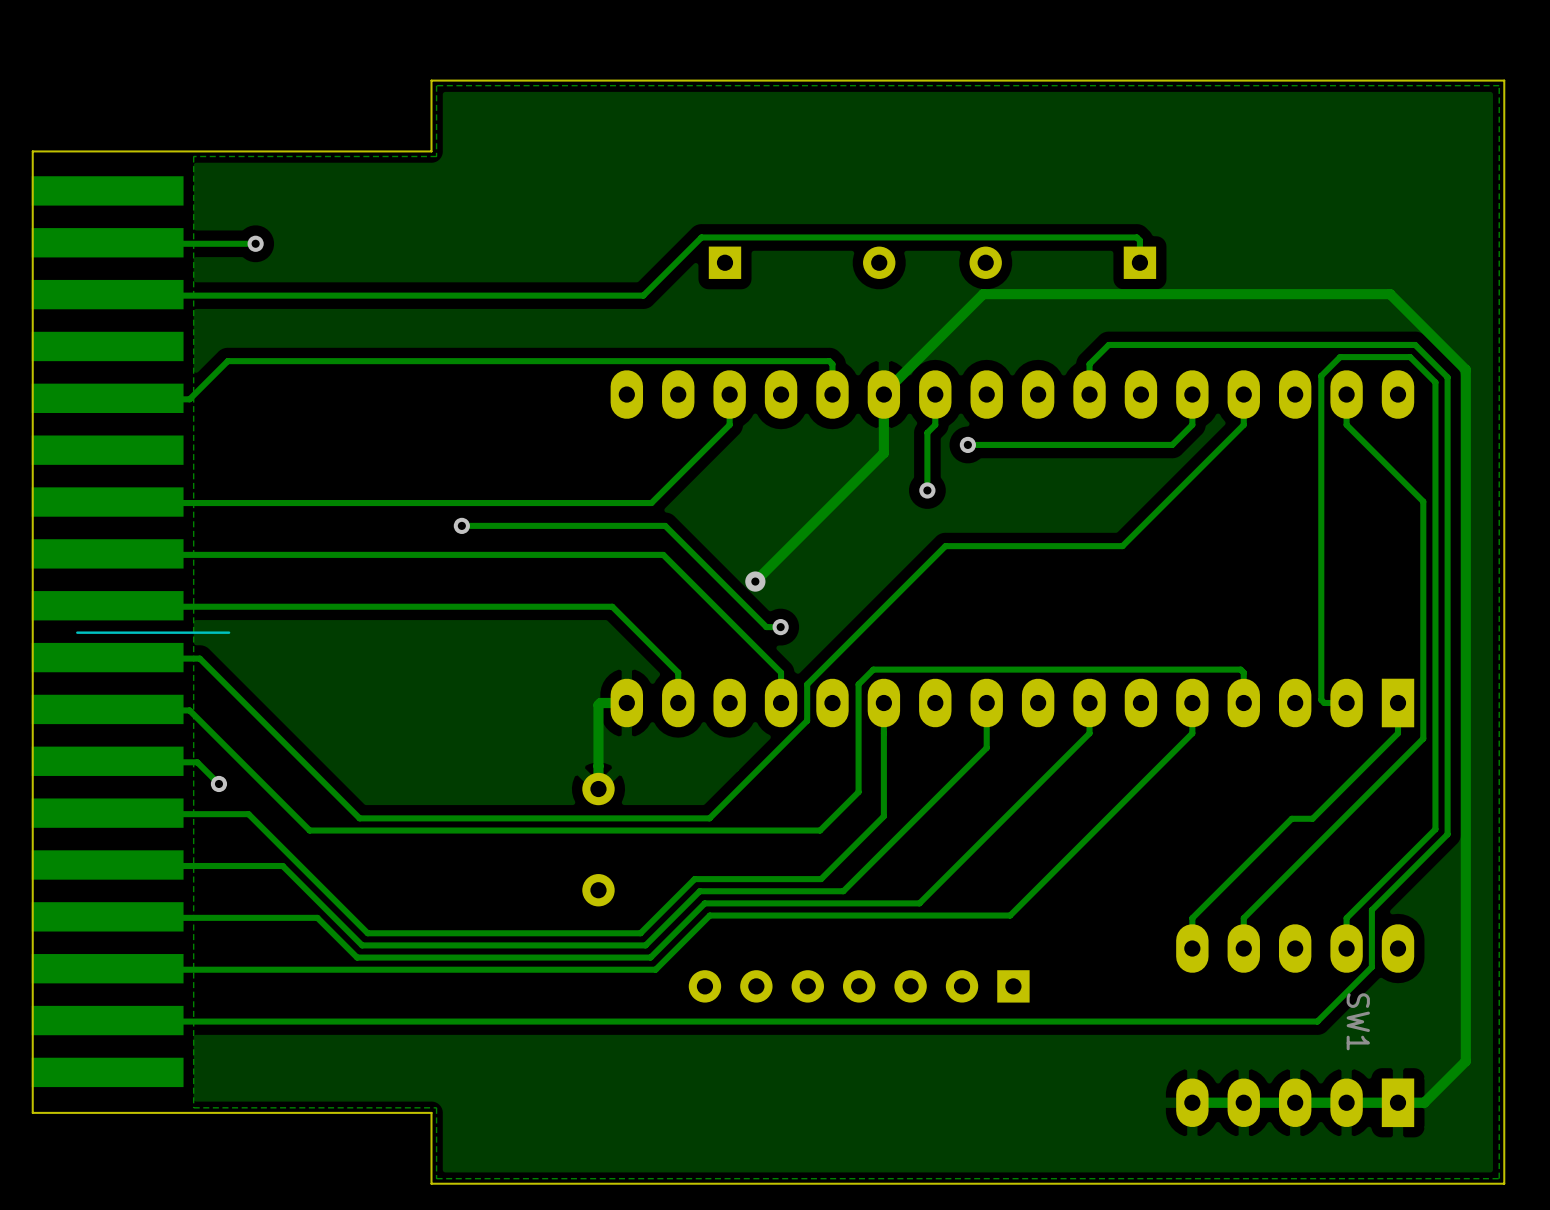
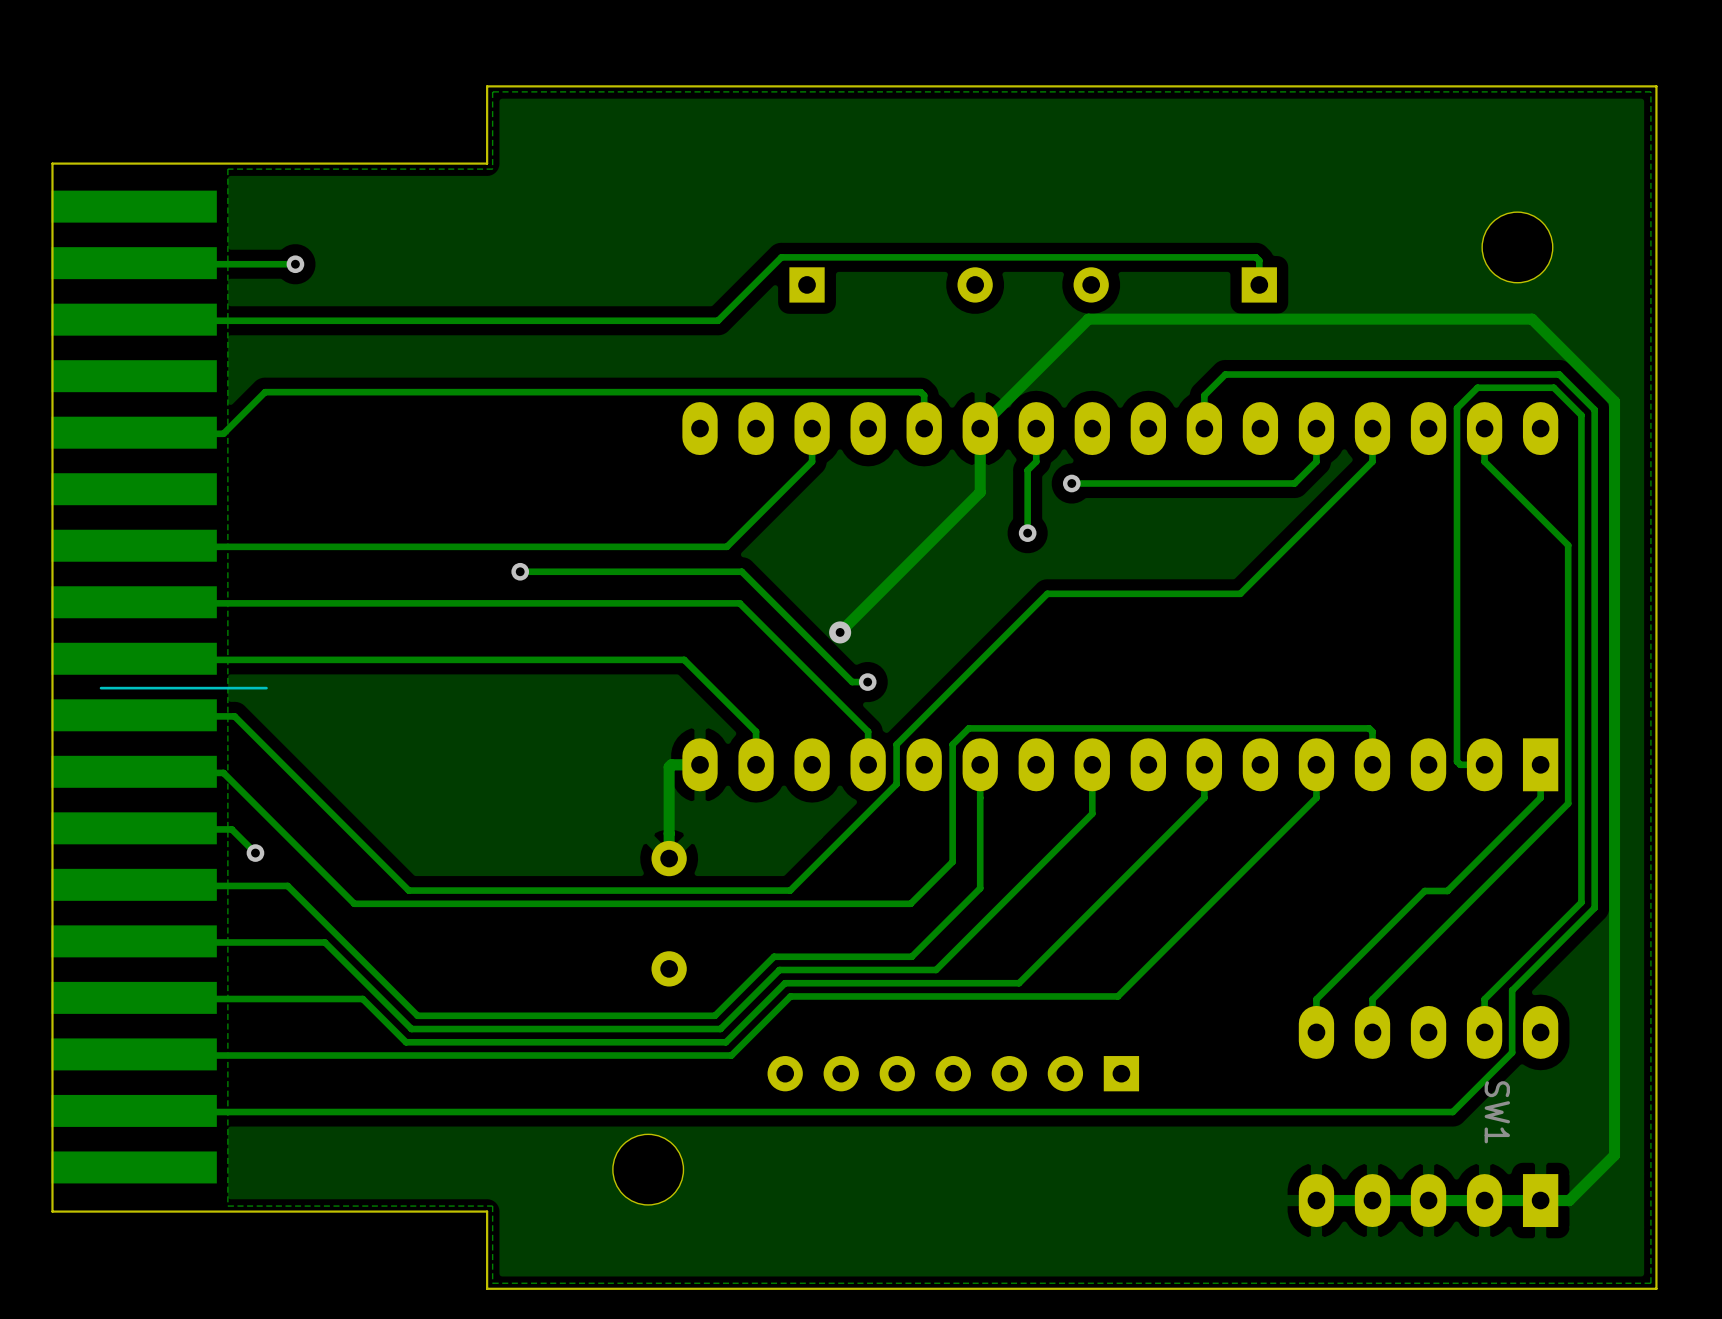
part: none -> (1517, 247)
part: none -> (648, 1169)

